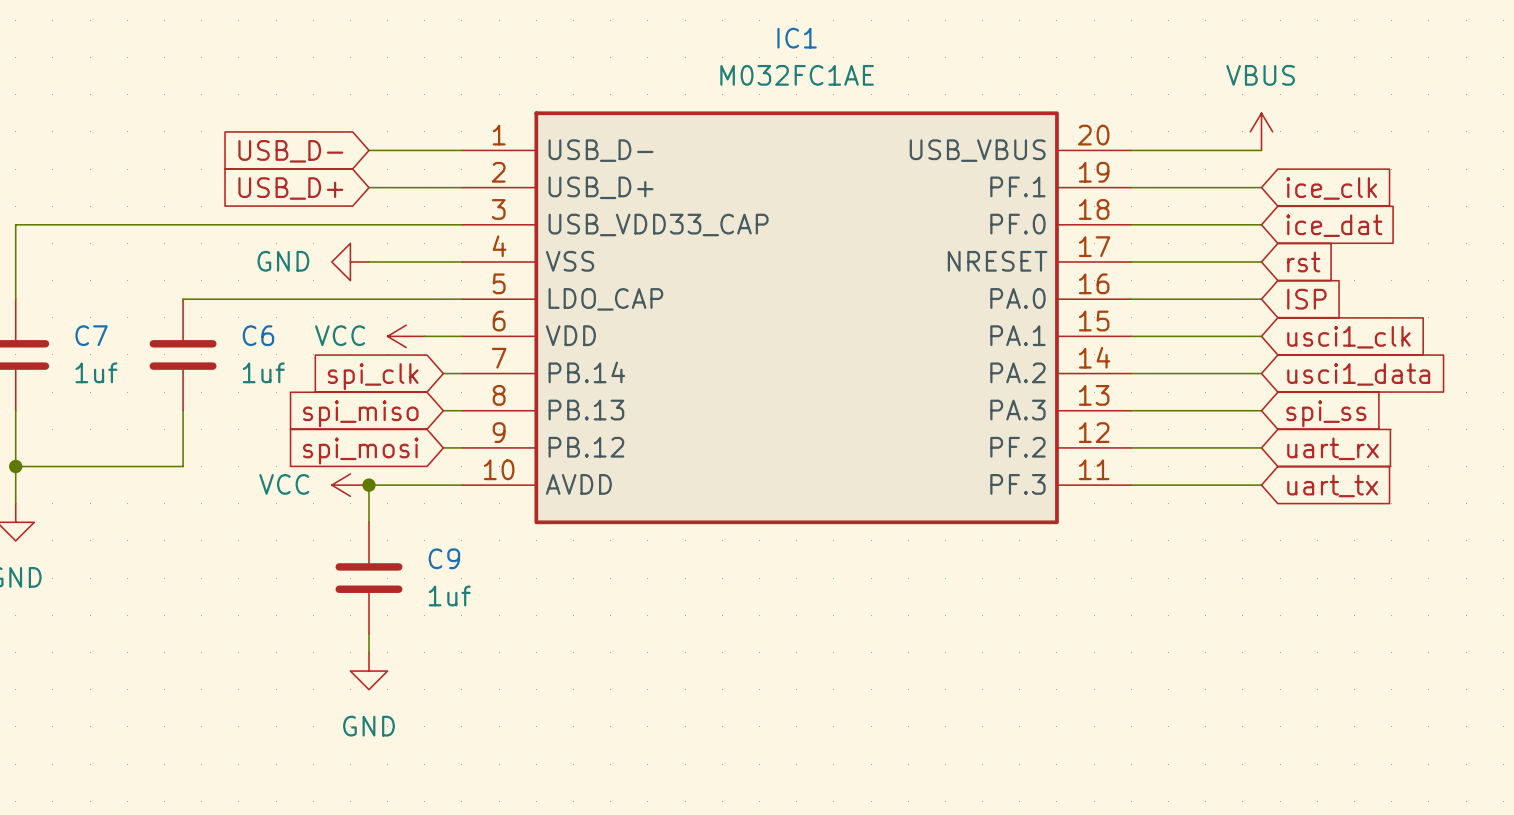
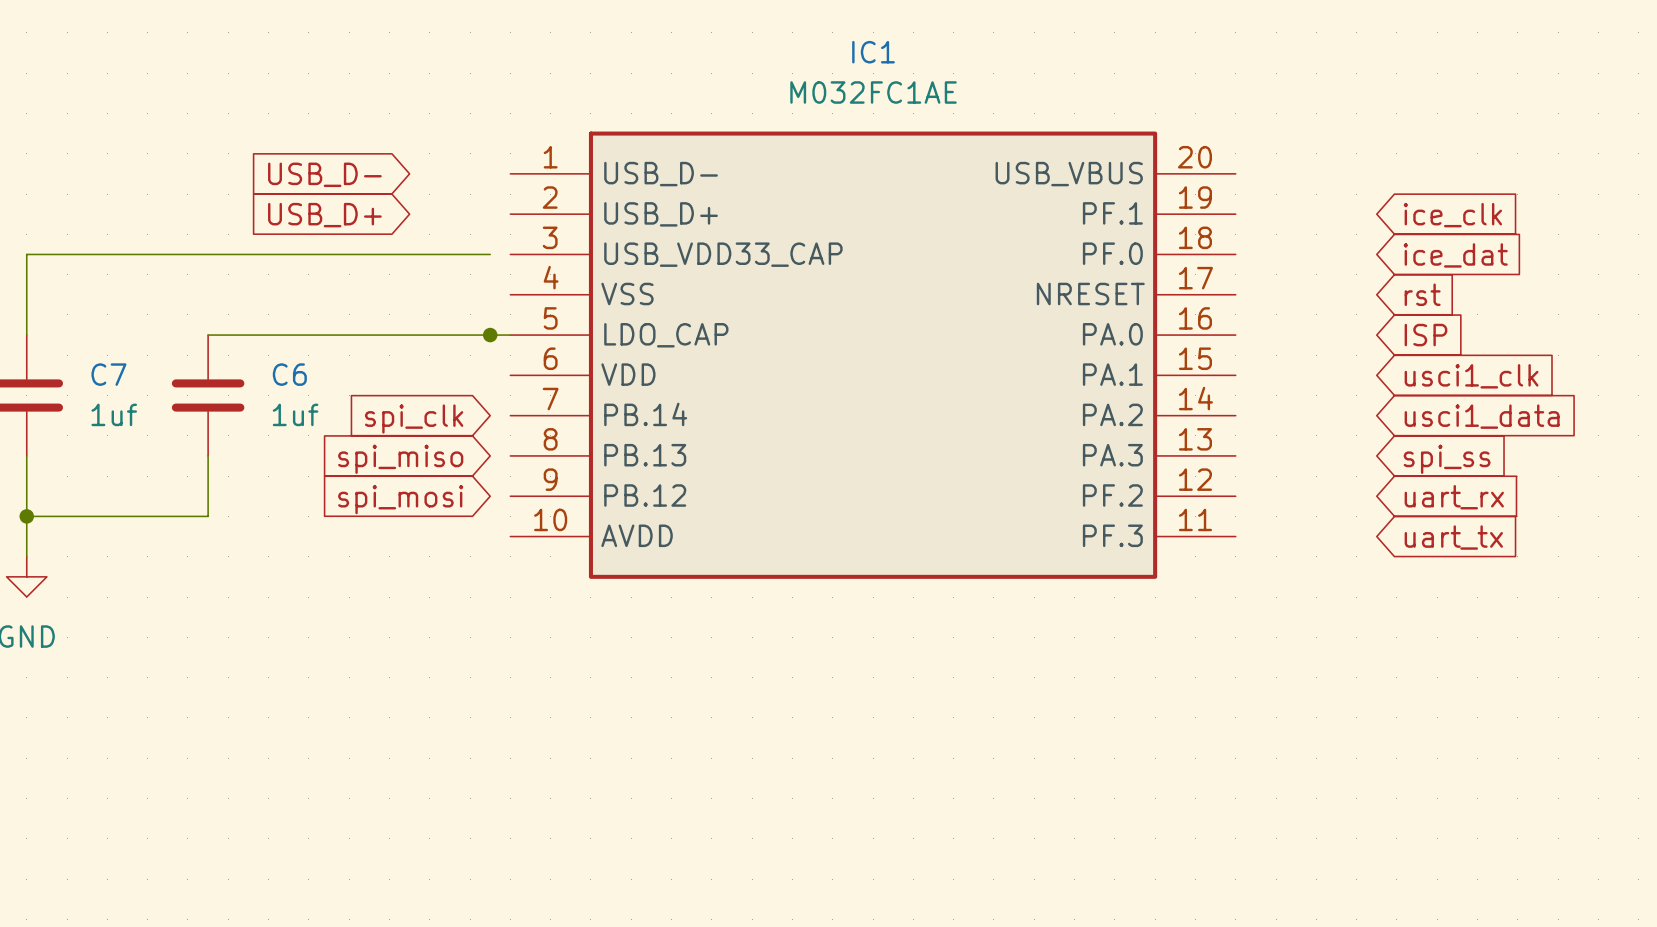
power symbol: VBUS (1261, 131) -> none
wire: (368, 150) (461, 150) -> none
wire: (1131, 150) (1261, 150) -> none
wire: (368, 187) (461, 187) -> none
wire: (1131, 187) (1261, 187) -> none
wire: (443, 224) (461, 224) -> none
wire: (1131, 224) (1261, 224) -> none
power symbol: GND (350, 261) -> none
wire: (368, 261) (461, 261) -> none
wire: (1131, 261) (1261, 261) -> none
junction: none -> (490, 335)
wire: (1131, 299) (1261, 299) -> none
power symbol: VCC (406, 336) -> none
wire: (424, 336) (461, 336) -> none
wire: (1131, 336) (1261, 336) -> none
wire: (443, 373) (461, 373) -> none
wire: (1131, 373) (1261, 373) -> none
wire: (443, 410) (461, 410) -> none
wire: (1131, 410) (1261, 410) -> none
wire: (443, 447) (461, 447) -> none
wire: (1131, 447) (1261, 447) -> none
power symbol: VCC (350, 485) -> none
junction: (368, 485) -> none
wire: (461, 485) (368, 485) (368, 522) -> none
wire: (1131, 485) (1261, 485) -> none
C9: 1uf (368, 578) -> none
wire: (368, 633) (368, 652) -> none
power symbol: GND (368, 671) -> none

